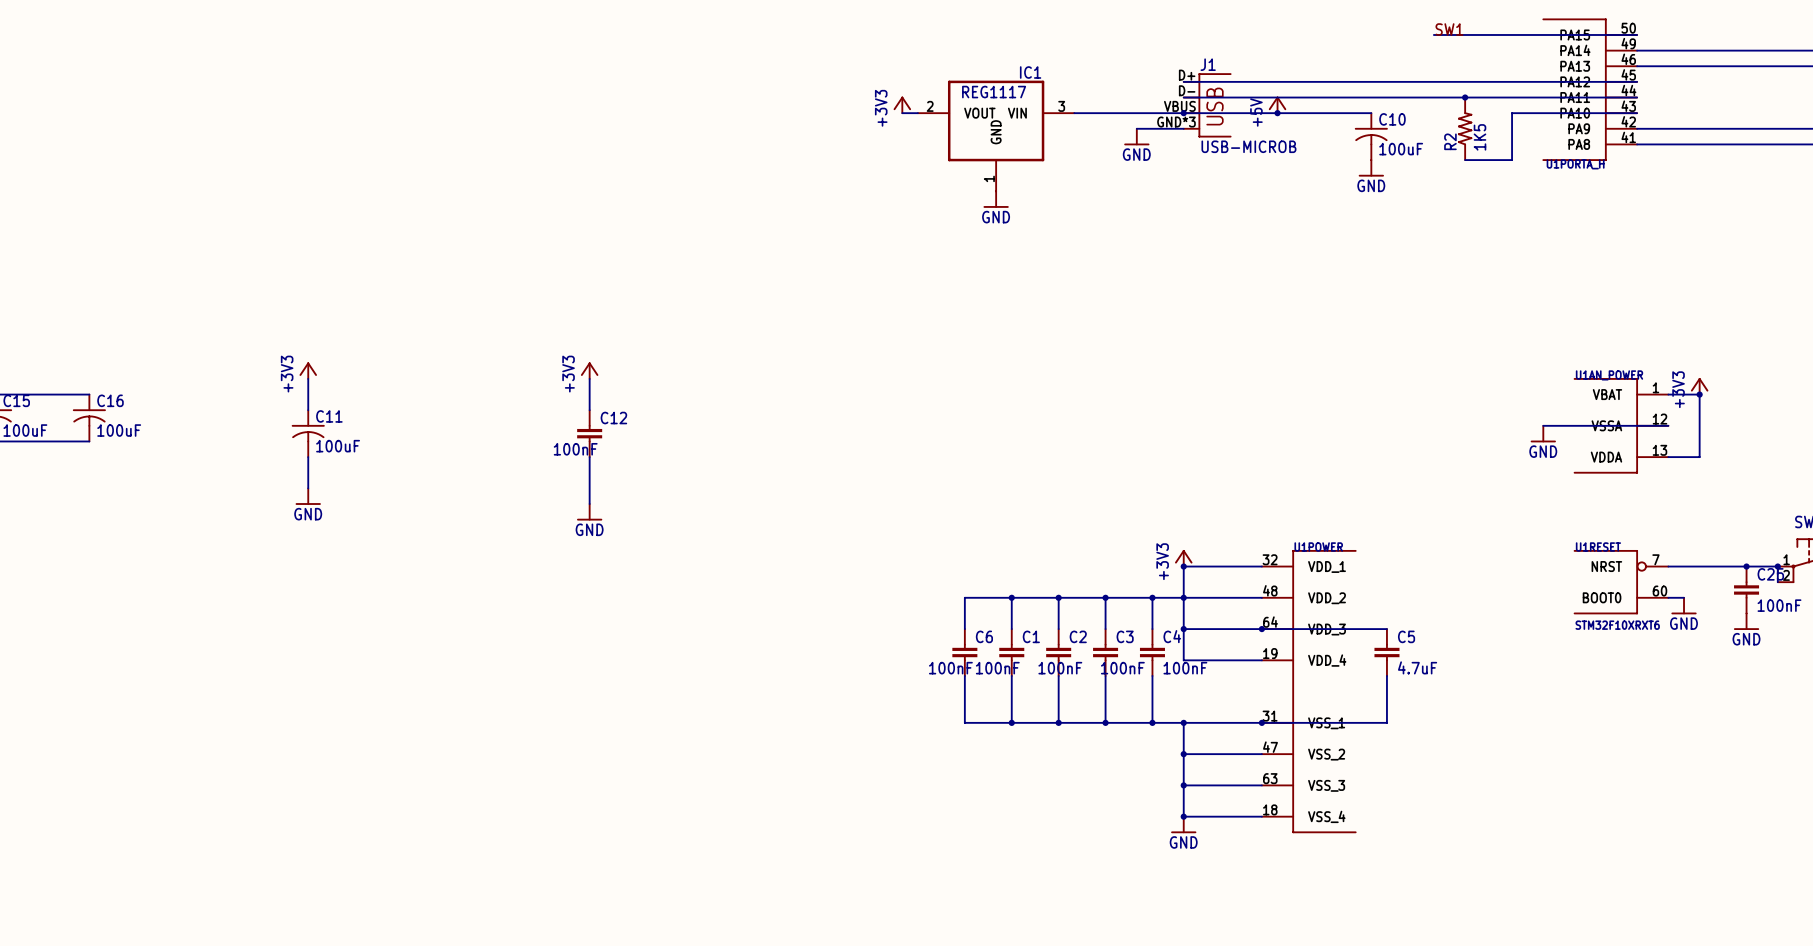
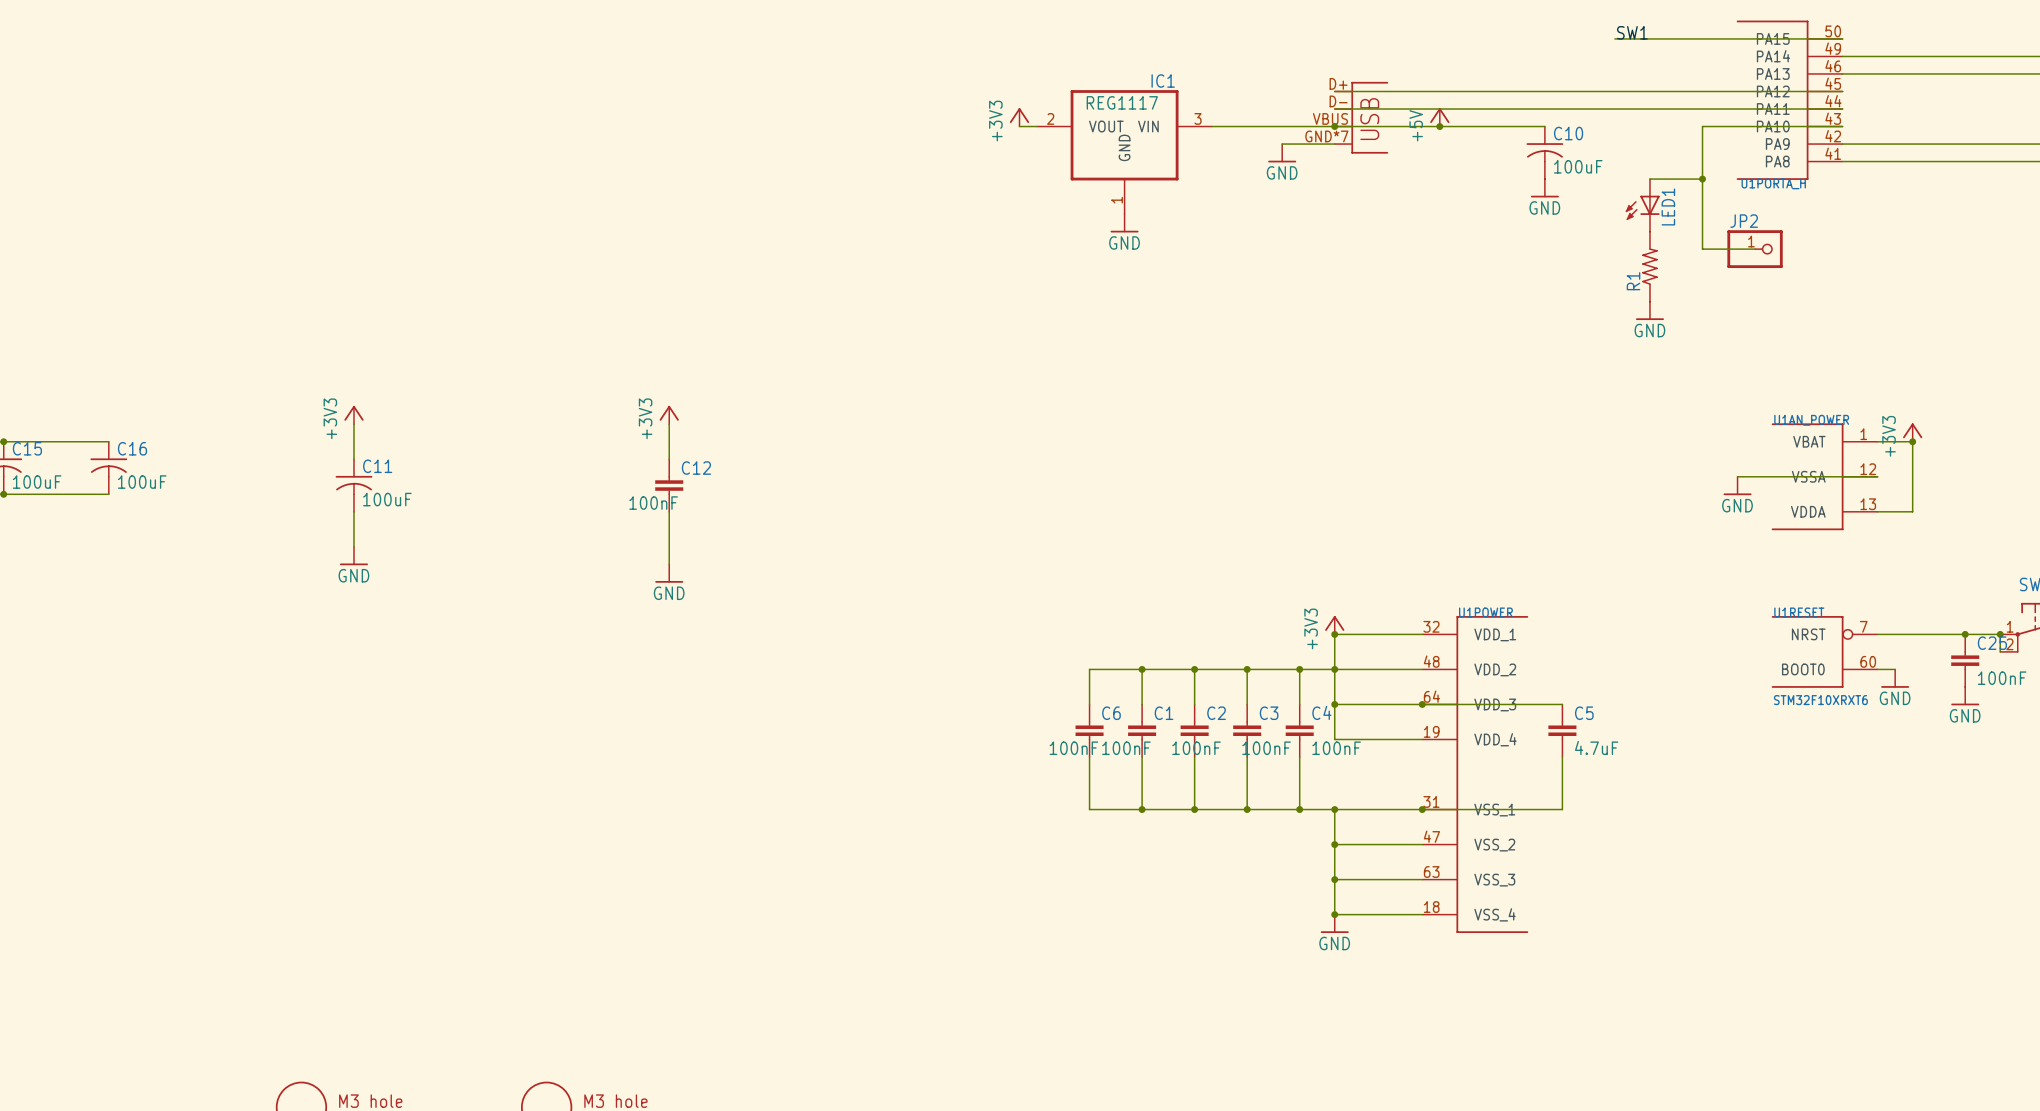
J1 name: J1 (1208, 64) -> none
junction: (1465, 97) -> none
J1 pin number: GND*3 (1176, 122) -> GND*7 (1326, 136)
R2: 1K5 (1465, 128) -> none
J1 value: USB-MICROB (1248, 146) -> none
wire: none -> (1702, 179) (1702, 249) (1755, 249)
junction: none -> (1702, 179)
LED1: none -> (1642, 205)
JP2: none -> (1755, 249)
R1: none -> (1649, 266)
power symbol: none -> GND (1649, 310)

